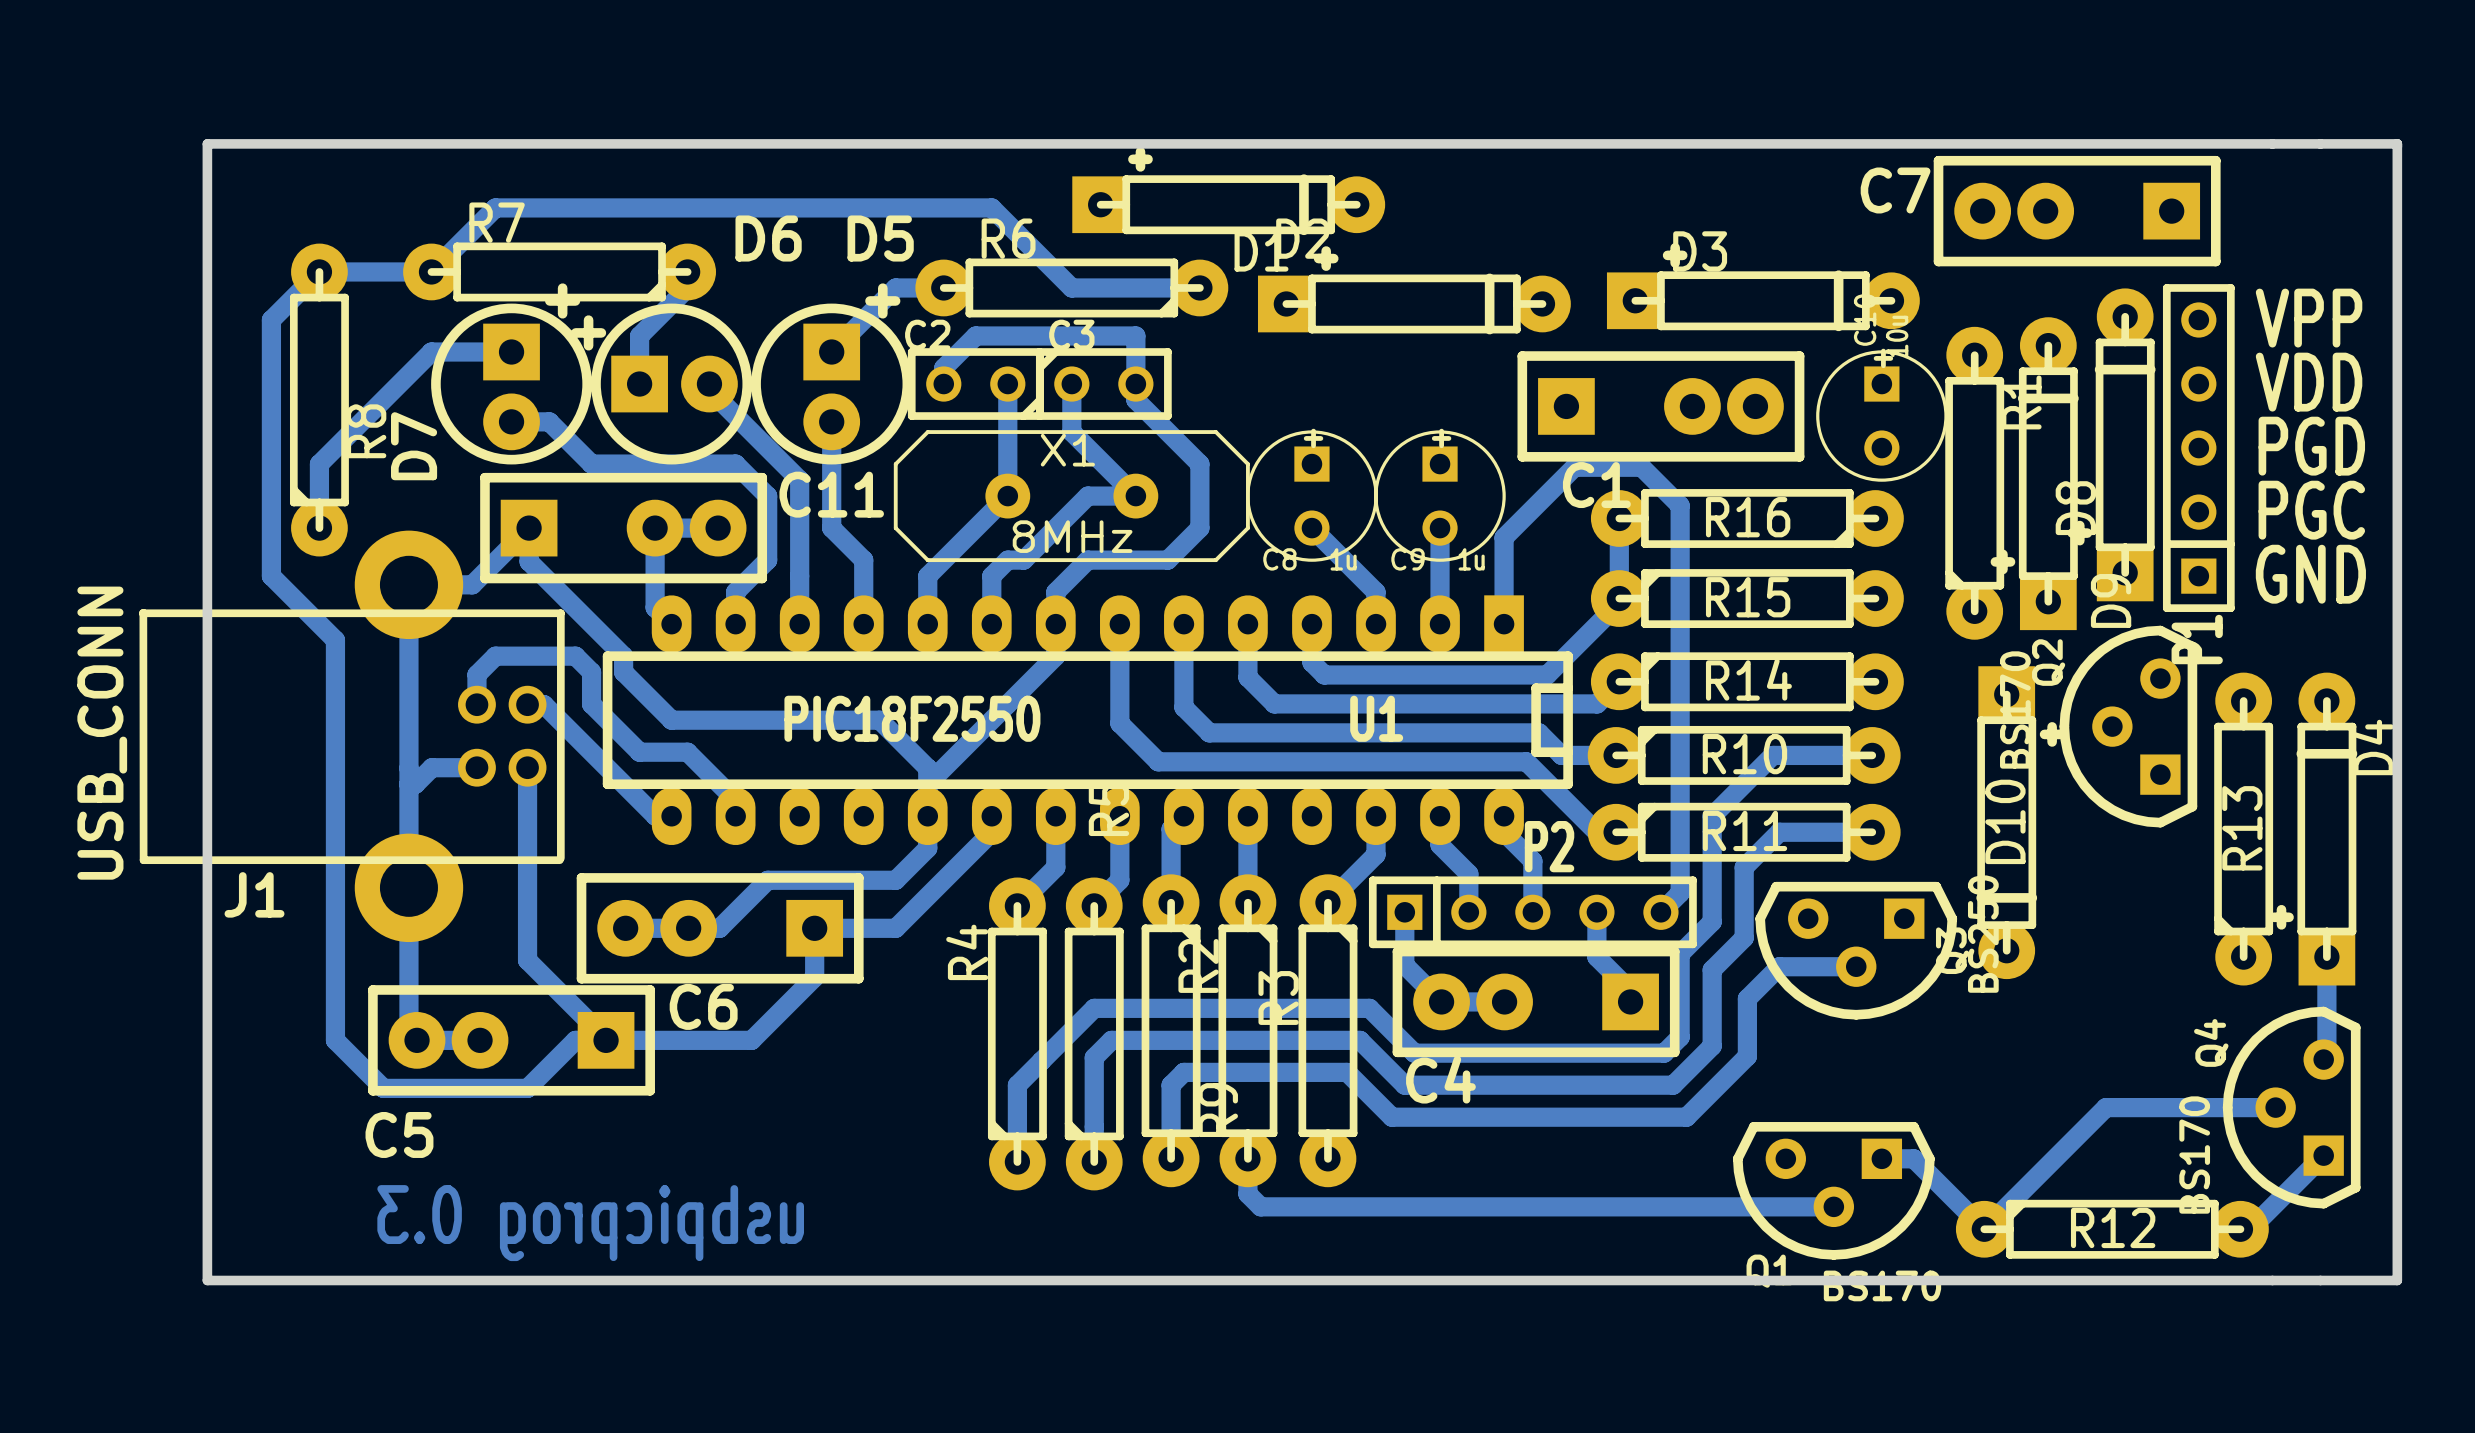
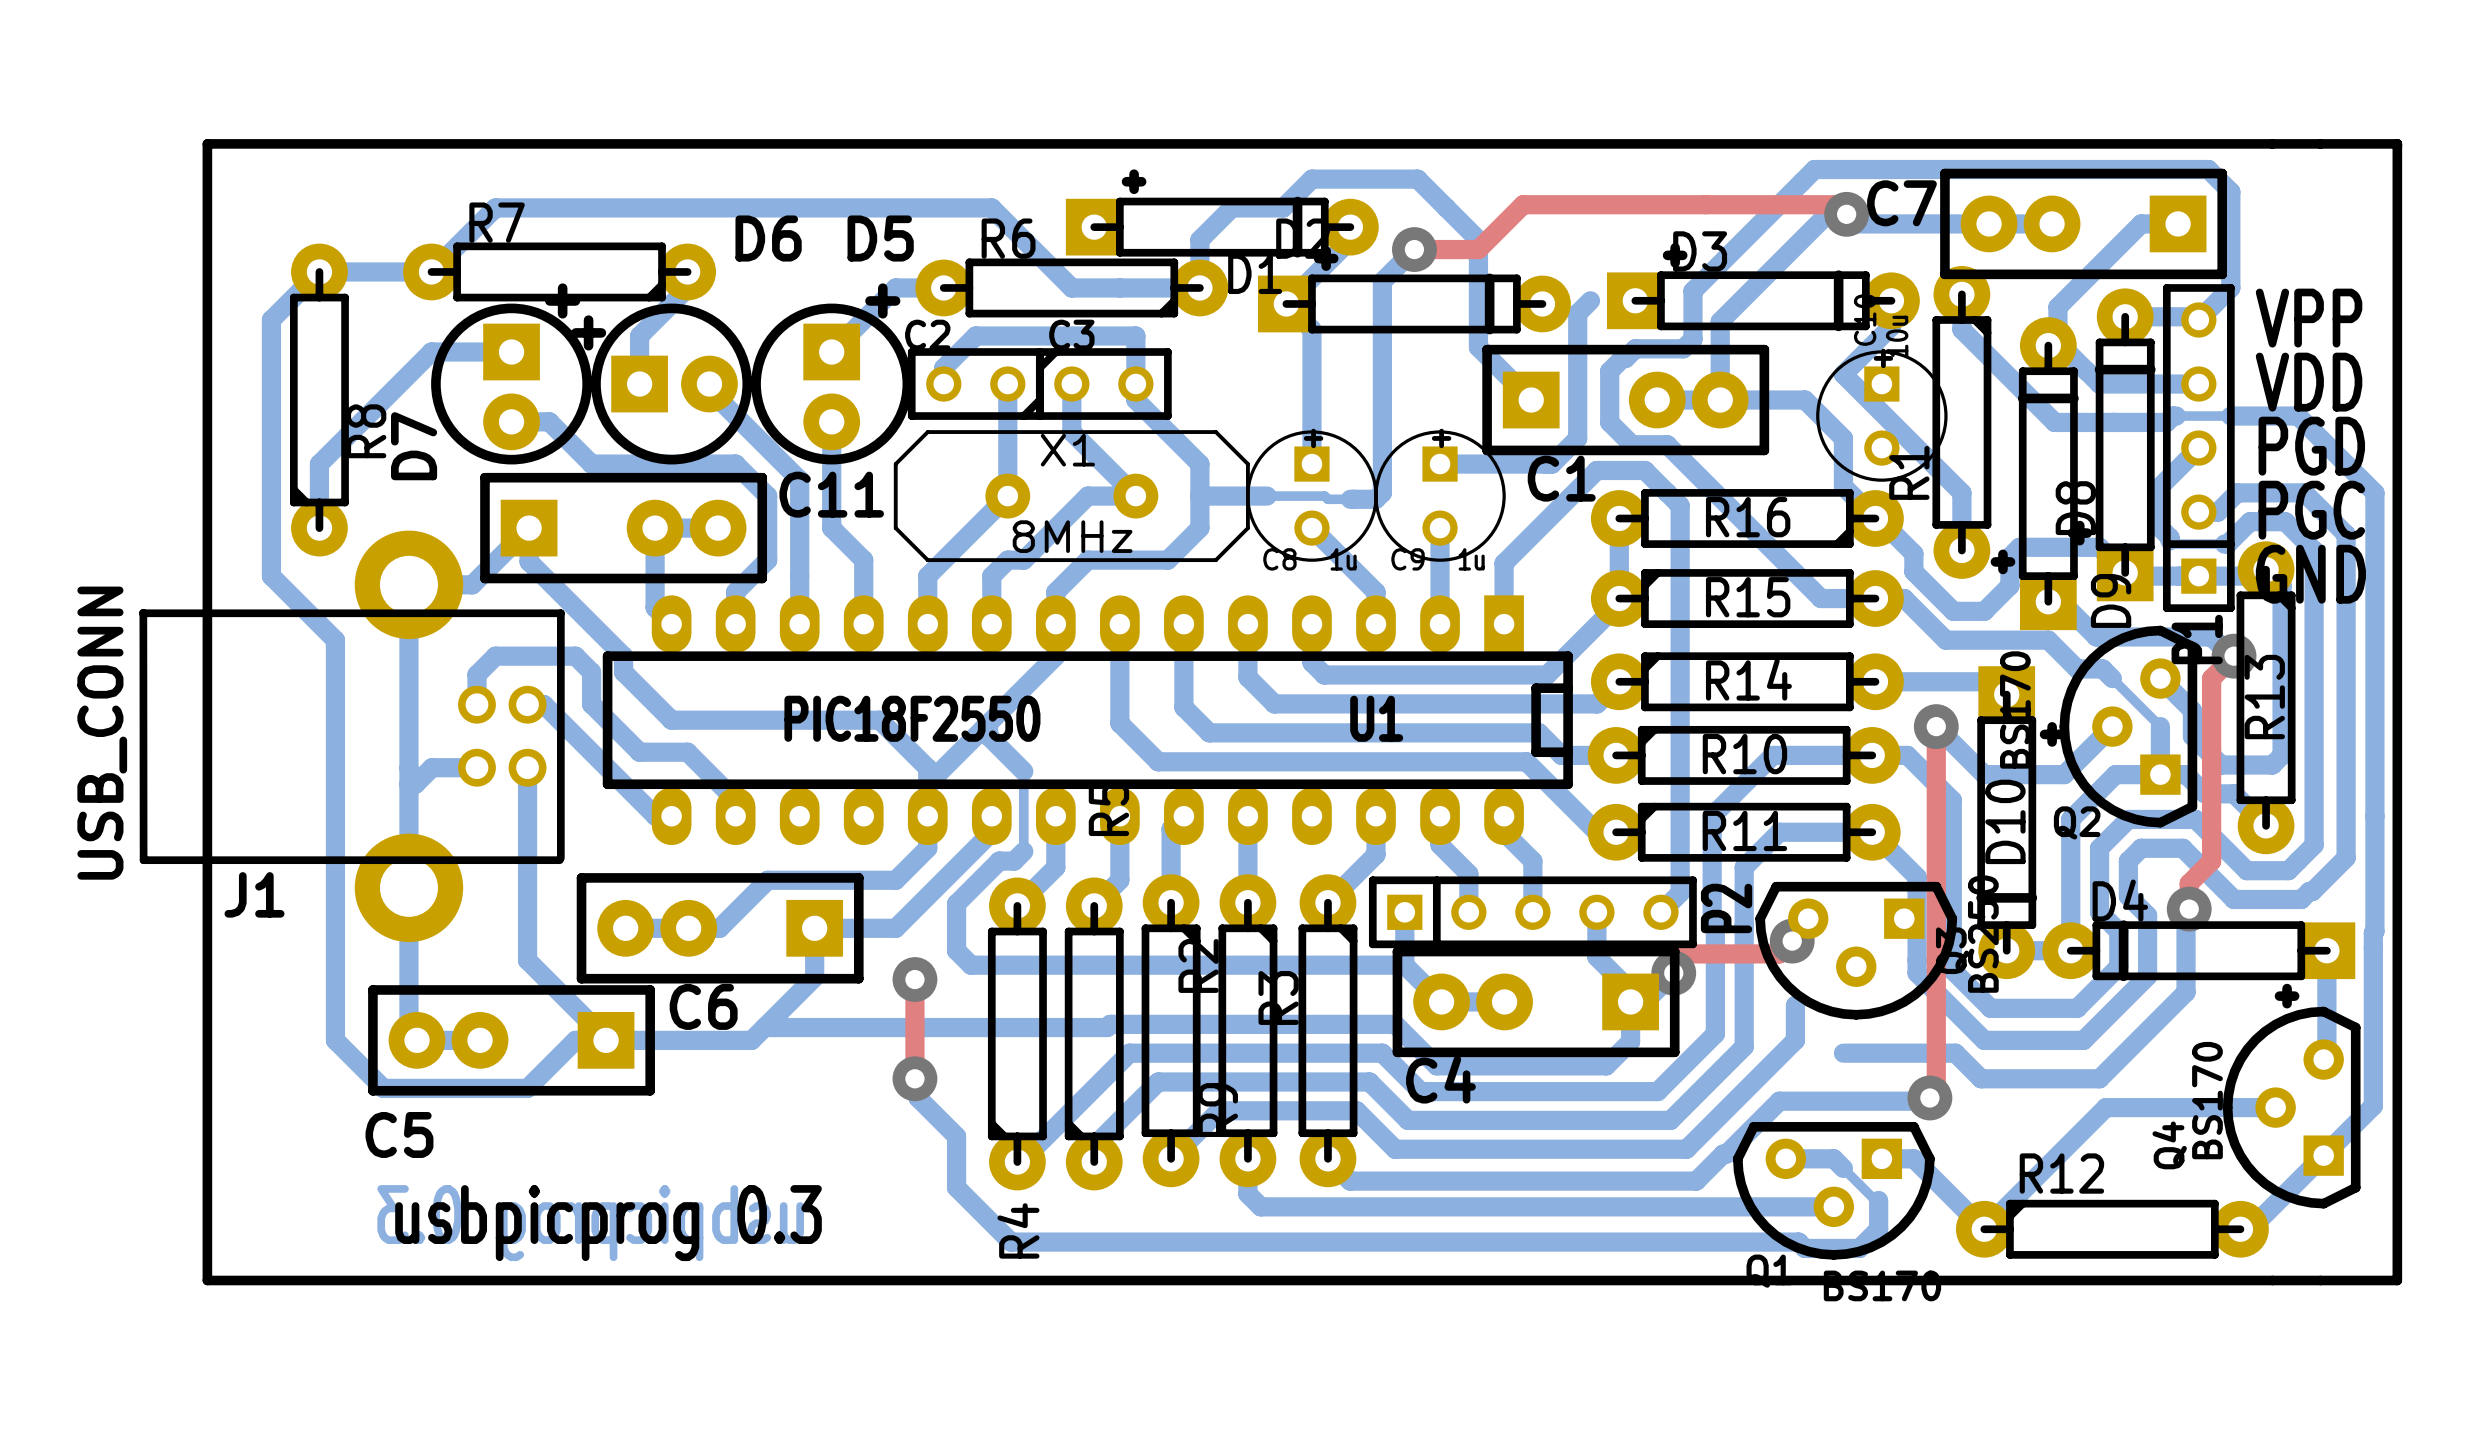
D1 position: (1228, 191) -> (1222, 213)
C7 position: (2077, 211) -> (2083, 223)
top track: none -> (1846, 214) (1837, 204) (1523, 204) (1478, 249) (1414, 249)
via: none -> (1846, 214)
bottom track: none -> (2052, 223) (1856, 223) (1843, 211) (1830, 211) (1720, 321) (1720, 400)
bottom track: none -> (2178, 223) (2141, 223) (2057, 307) (2057, 342) (2099, 384) (2198, 384)
bottom track: none -> (1350, 227) (1350, 239) (1286, 303) (1311, 329) (1311, 464)
bottom track: none -> (1414, 249) (1382, 281) (1382, 492) (1375, 499) (1350, 499)
via: none -> (1414, 249)
bottom track: none -> (1199, 287) (1199, 239) (1231, 207) (1283, 207) (1311, 179) (1417, 179) (1478, 239) (1478, 347) (1531, 400)
bottom track: none -> (1961, 294) (1961, 329) (2054, 422) (2166, 422) (2173, 416) (2298, 416) (2374, 492) (2373, 1106) (2323, 1155)
bottom track: none -> (1590, 300) (1577, 313) (1577, 438) (1552, 464) (1440, 464)
bottom track: none -> (1891, 300) (1891, 326) (1843, 374) (1961, 492) (1961, 550)
bottom track: none -> (2125, 316) (2195, 316) (2198, 319) (2230, 287) (2230, 191) (2208, 169) (1814, 169) (1692, 291) (1692, 339) (1683, 348) (1635, 348) (1609, 371) (1609, 422) (1632, 444) (1667, 444) (1821, 598) (1904, 598) (1945, 640) (2048, 640) (2077, 668) (2102, 668) (2160, 726)
bottom track: none -> (1657, 400) (1805, 400) (1843, 438) (1843, 486) (1913, 553) (1913, 571) (1953, 611) (1984, 611) (2009, 585) (2009, 556) (2019, 547) (2099, 547) (2128, 576) (2259, 576) (2266, 569) (2282, 585) (2282, 755) (2272, 765) (2221, 765) (2192, 736) (2192, 710) (2160, 678)
C1 position: (1660, 406) -> (1625, 400)
bottom track: none -> (2198, 448) (2160, 486) (2160, 528) (2170, 537) (2173, 544) (2227, 544) (2250, 521) (2285, 521) (2314, 550) (2314, 845) (2288, 870) (2246, 870) (2195, 819) (2128, 819) (2099, 848) (2099, 912) (2118, 931) (2118, 966) (2077, 1008) (1990, 1008) (1952, 969) (1952, 800) (1907, 755) (1872, 755)
bottom track: (1644, 470) (1641, 467) (1574, 467) (1504, 537) (1504, 563) -> (1644, 470) (1596, 470) (1504, 563)
R1 rotation: 0° (1974, 483) -> 180° (1961, 422)
bottom track: none -> (1199, 496) (1324, 496) (1327, 499) (1353, 499)
bottom track: none -> (2192, 512) (2218, 512) (2237, 492) (2304, 492) (2346, 534) (2346, 857) (2312, 891) (2309, 891) (2301, 899) (2234, 899) (2182, 848) (2141, 848) (2128, 861) (2128, 896) (2147, 915) (2147, 976) (2083, 1040) (1984, 1040) (1917, 973) (1917, 877) (1872, 832)
bottom track: none -> (2057, 595) (2057, 598) (2096, 636) (2211, 636) (2230, 656) (2234, 656)
top track: none -> (2234, 656) (2211, 678) (2211, 861) (2189, 883) (2189, 909)
via: none -> (2234, 656)
Q2 name rotation: 0° (2048, 662) -> 90° clockwise (2077, 822)
Q2 name position: Q2 (2048, 662) -> Q2 (2077, 822)
bottom track: none -> (1875, 681) (1993, 681) (2006, 694)
bottom track: none -> (1936, 726) (1984, 774) (2064, 774) (2112, 726)
top track: none -> (1936, 726) (1936, 1091) (1929, 1098)
via: none -> (1936, 726)
bottom track: none -> (2160, 726) (2160, 774)
bottom track: none -> (982, 729) (1023, 771) (1023, 851) (1014, 861) (999, 861) (956, 903) (956, 950) (971, 965) (1404, 965)
bottom track: none -> (2266, 825) (2234, 793) (2205, 793) (2186, 774) (2115, 774) (2070, 819) (2070, 950) (2006, 950)
R13 rotation: 0° (2243, 829) -> 180° (2266, 697)
D4 rotation: 0° (2313, 829) -> 90° counterclockwise (2198, 964)
P2 name rotation: 0° (1549, 846) -> 90° counterclockwise (1726, 908)
P2 name position: P2 (1549, 846) -> P2 (1726, 908)
bottom track: none -> (2189, 909) (2186, 912) (2186, 992) (2099, 1078) (1981, 1078) (1955, 1053) (1843, 1053)
via: none -> (2189, 909)
bottom track: (1712, 921) (1680, 953) (1680, 1037) (1664, 1053) (1414, 1053) (1369, 1008) (1094, 1008) (1017, 1085) (1017, 1162) -> (1712, 921) (1715, 925) (1715, 1033) (1657, 1091) (1420, 1091) (1382, 1053) (1129, 1053) (1020, 1162) (1017, 1162)
bottom track: (1744, 937) (1712, 969) (1712, 1046) (1673, 1085) (1404, 1085) (1359, 1040) (1111, 1040) (1094, 1057) (1094, 1146) -> (1744, 937) (1744, 1046) (1670, 1120) (1408, 1120) (1369, 1081) (1158, 1081) (1094, 1146)
top track: none -> (1792, 941) (1779, 953) (1680, 953) (1680, 969) (1673, 973)
via: none -> (1792, 941)
R4 name position: R4 (967, 952) -> R4 (1018, 1230)
bottom track: (1856, 966) (1779, 966) (1747, 998) (1747, 1056) (1686, 1117) (1392, 1117) (1347, 1072) (1183, 1072) (1171, 1085) (1171, 1158) -> (1795, 1005) (1795, 1040) (1686, 1149) (1395, 1149) (1356, 1110) (1219, 1110) (1171, 1158)
bottom track: none -> (1673, 973) (1644, 1001) (1630, 1001) (1630, 1041) (1606, 1065) (1436, 1065) (1395, 1024) (1110, 1024) (1107, 1027) (764, 1027)
via: none -> (1673, 973)
top track: none -> (914, 979) (914, 1078)
via: none -> (914, 979)
Q4 name position: Q4 (2211, 1042) -> Q4 (2169, 1145)
bottom track: none -> (914, 1078) (918, 1081) (918, 1098) (956, 1136) (956, 1187) (1011, 1242) (1798, 1242) (1805, 1248) (1859, 1248) (1878, 1229) (1878, 1200) (1872, 1197) (1833, 1158) (1785, 1158)
via: none -> (914, 1078)
bottom track: none -> (1929, 1098) (1933, 1101) (1779, 1101) (1696, 1181) (1350, 1181) (1327, 1158)
via: none -> (1929, 1098)
Q4 value position: BS170 (2194, 1155) -> BS170 (2207, 1100)
text: none -> usbpicprog 0.3 (608, 1223)
R12 name position: R12 (2113, 1227) -> R12 (2061, 1173)

